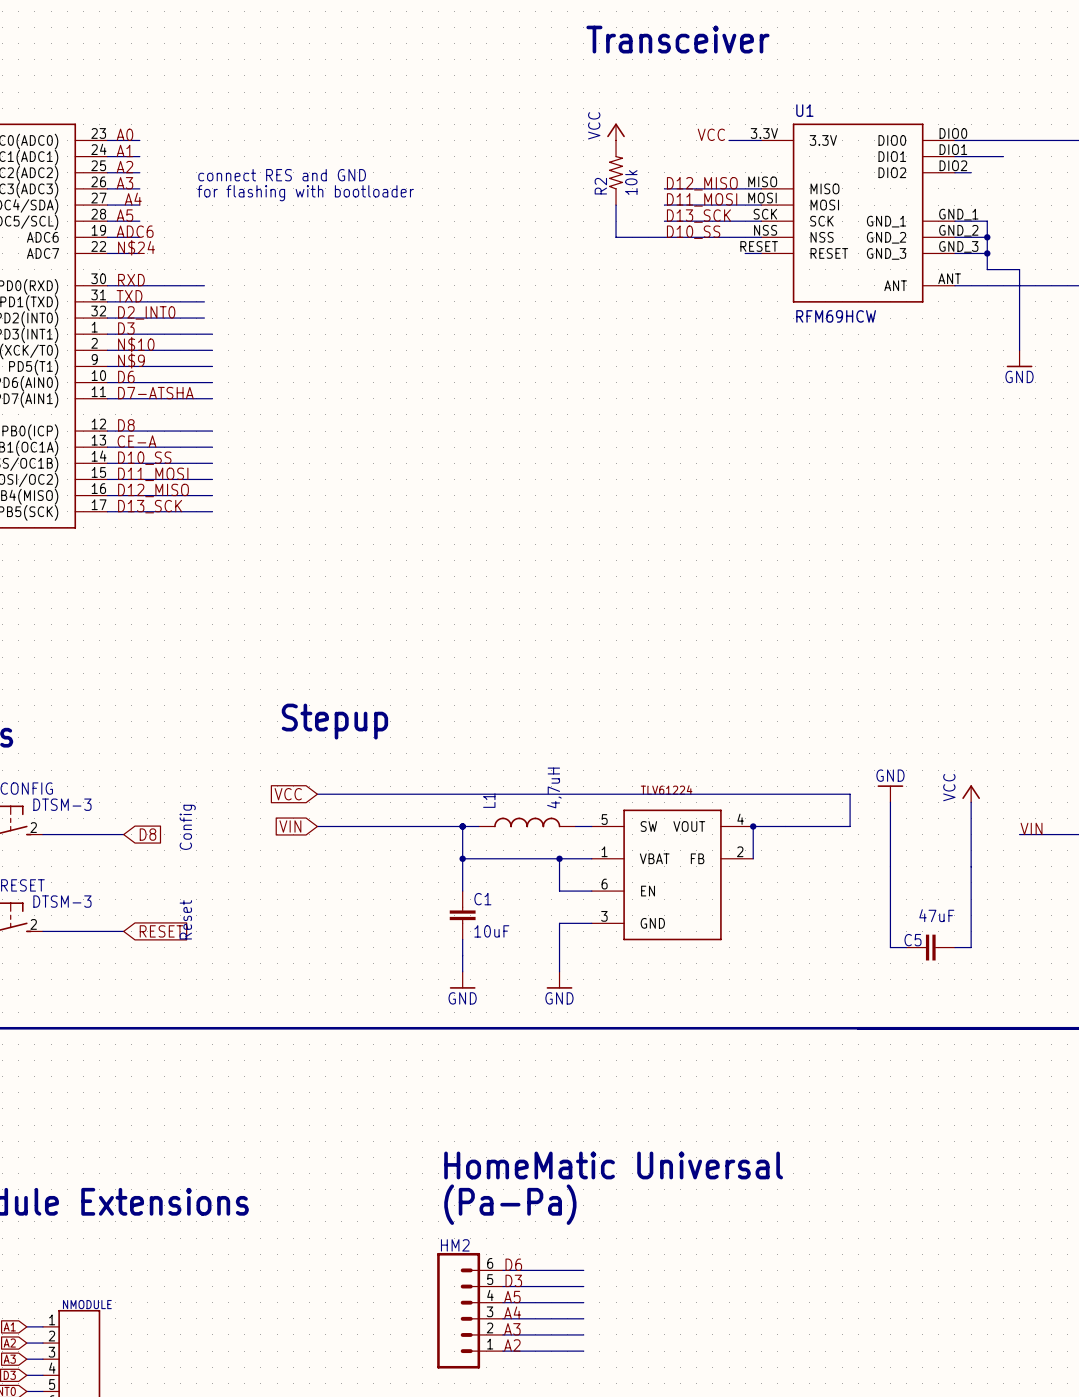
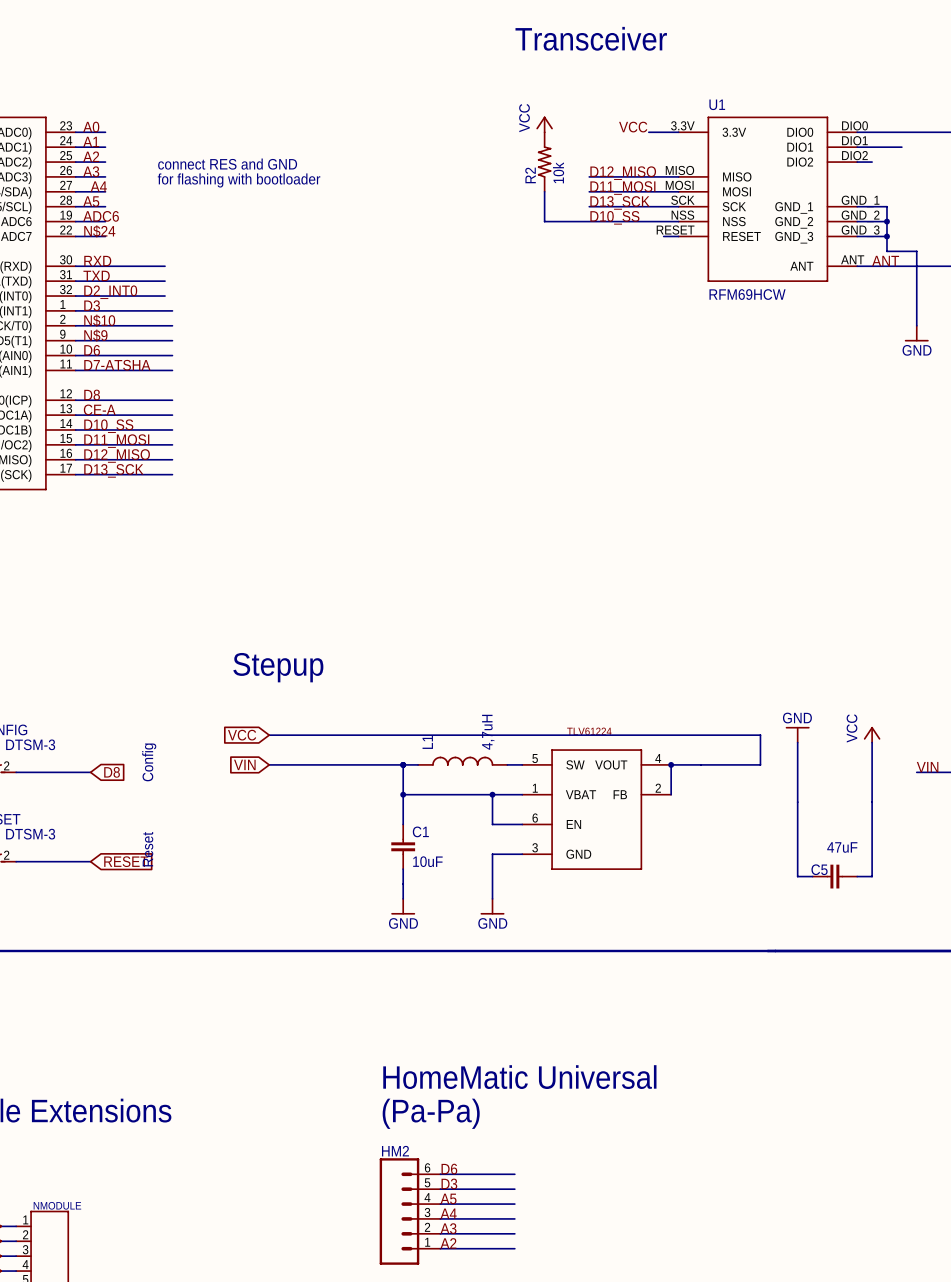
label: none -> ANT (885, 261)

